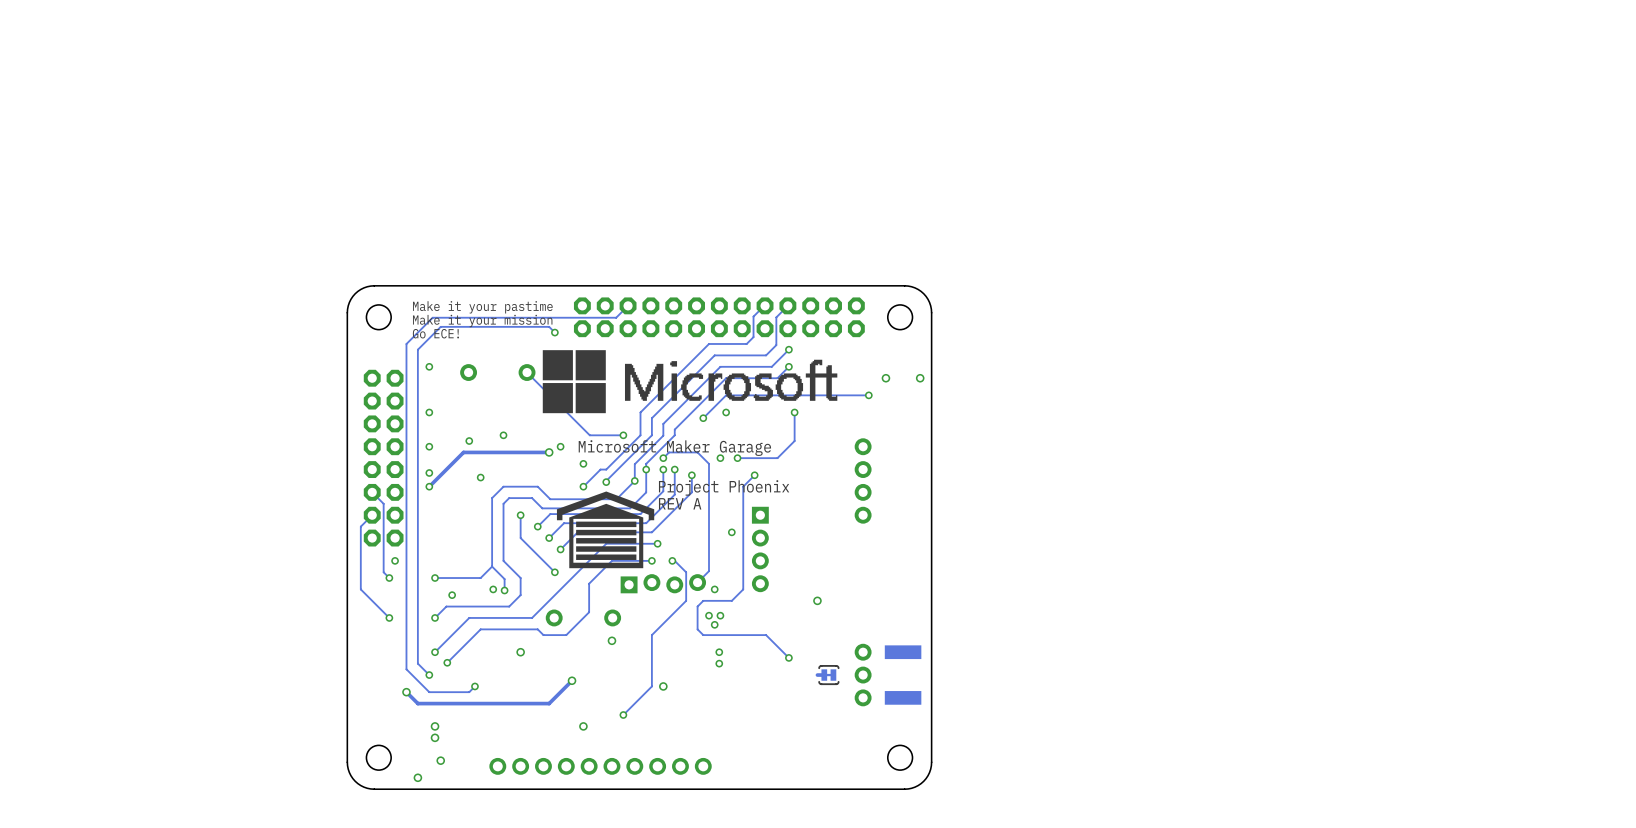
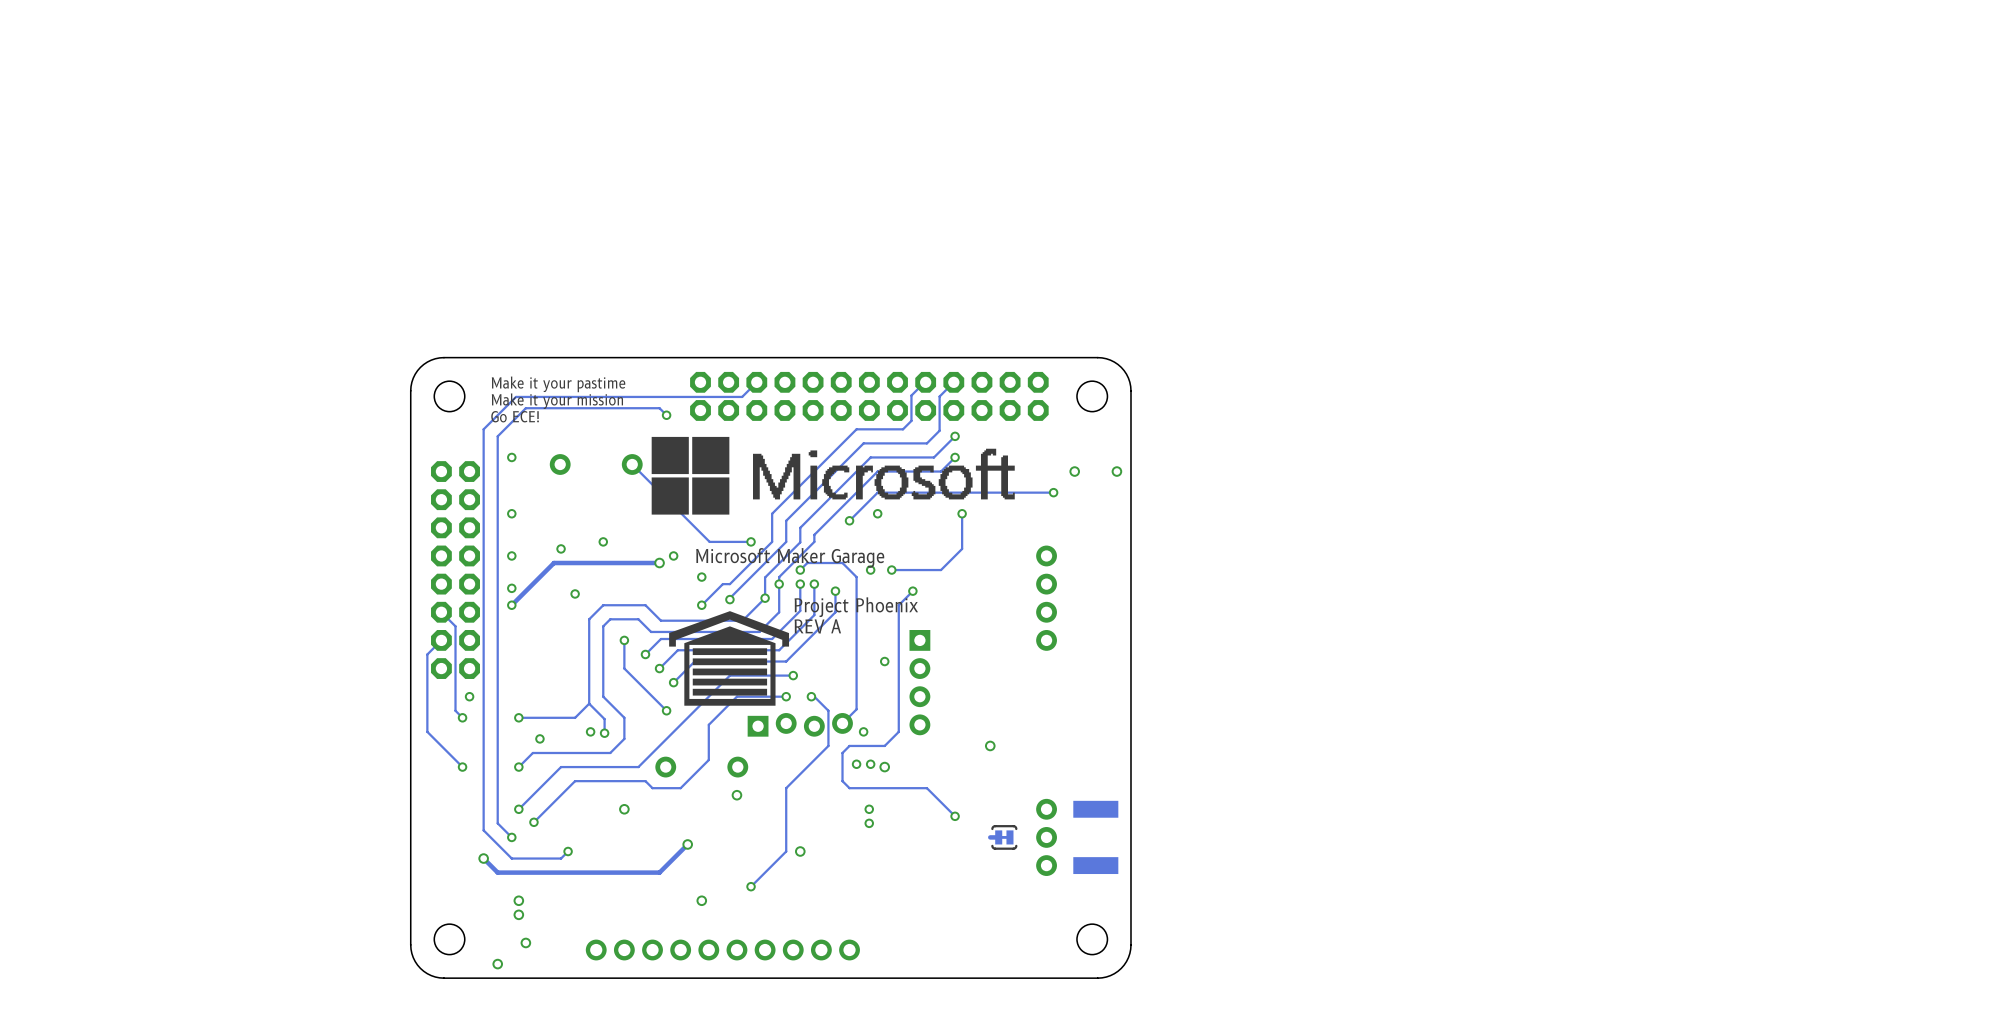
via: none -> (884, 767)
via: (714, 624) -> none

